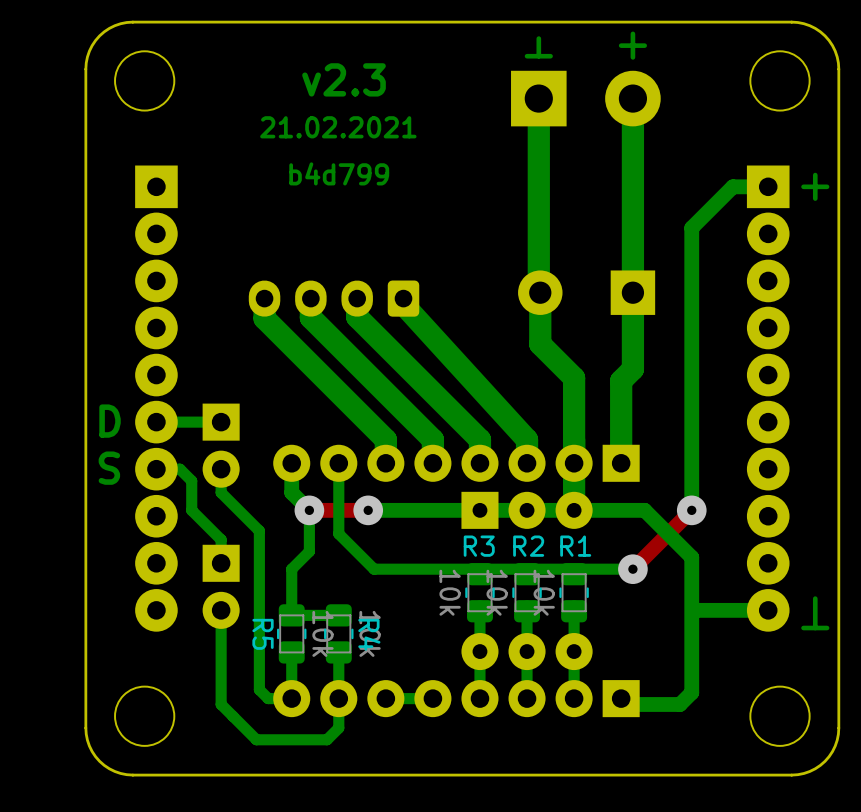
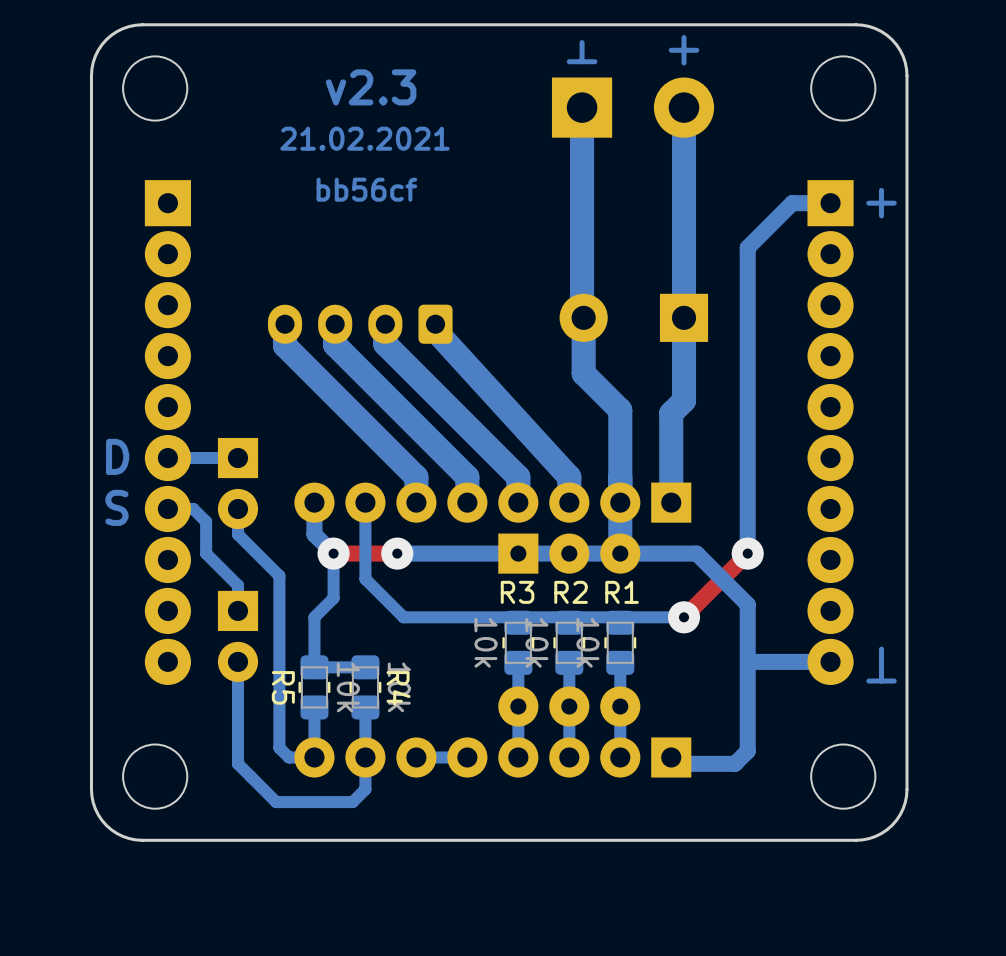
text: b4d799 (339, 173) -> bb56cf (366, 189)

